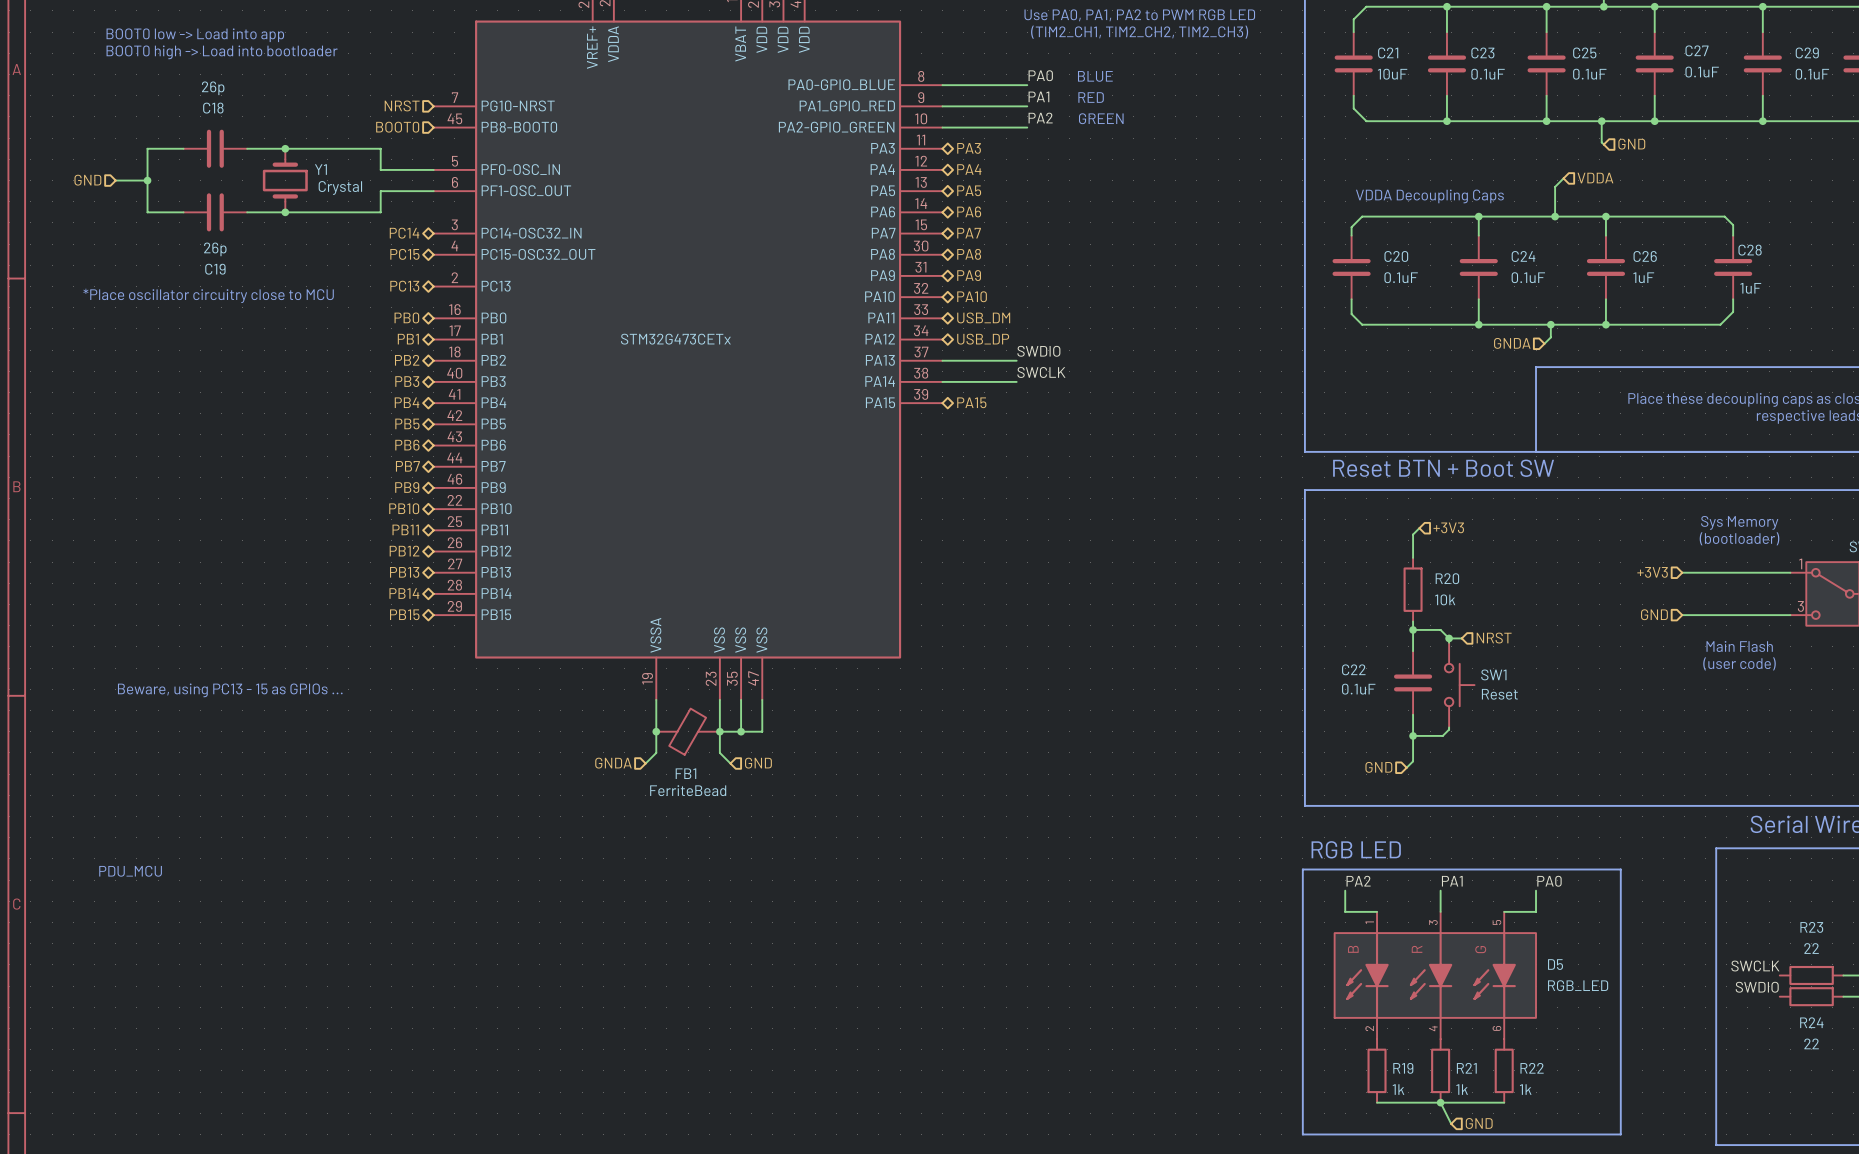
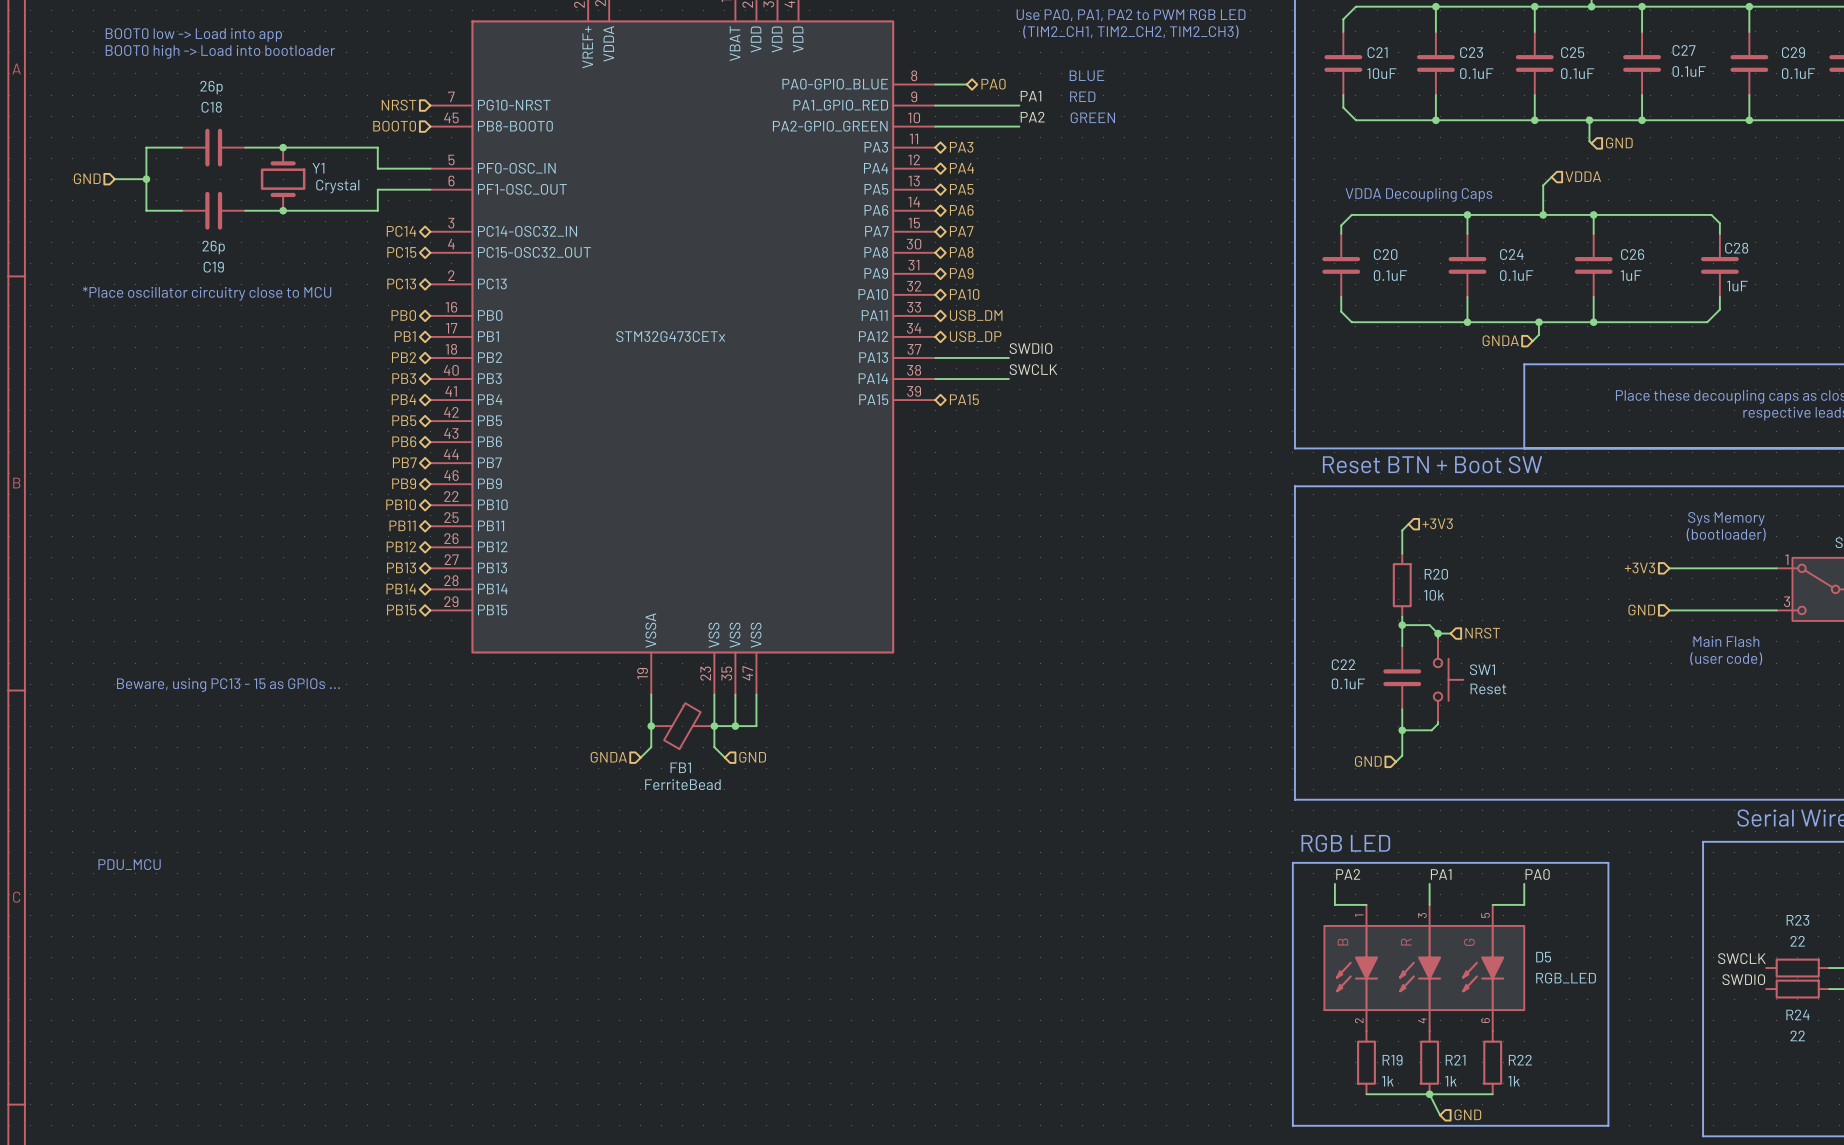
label: PA0 (1040, 75) -> none
hierarchical label: none -> PA0 (993, 84)
wire: (974, 85) (1027, 85) -> none

